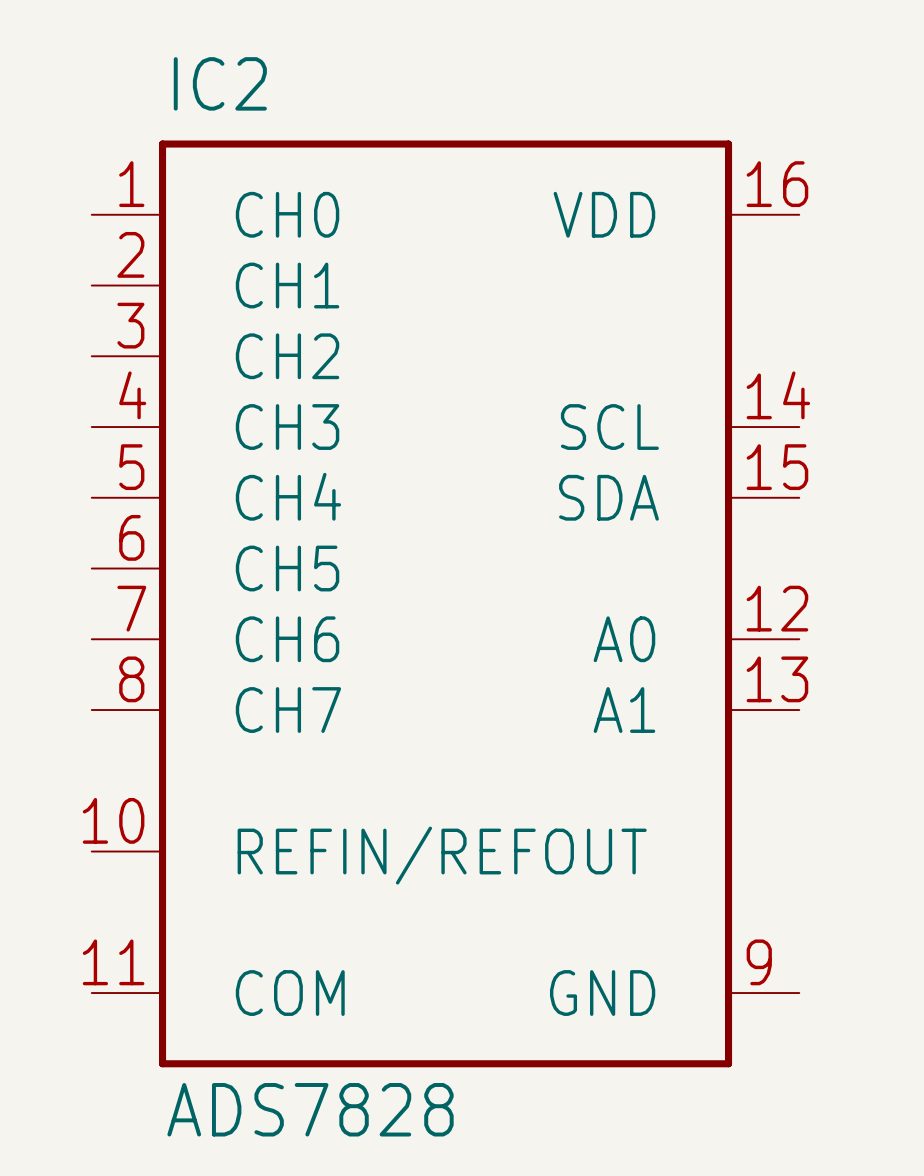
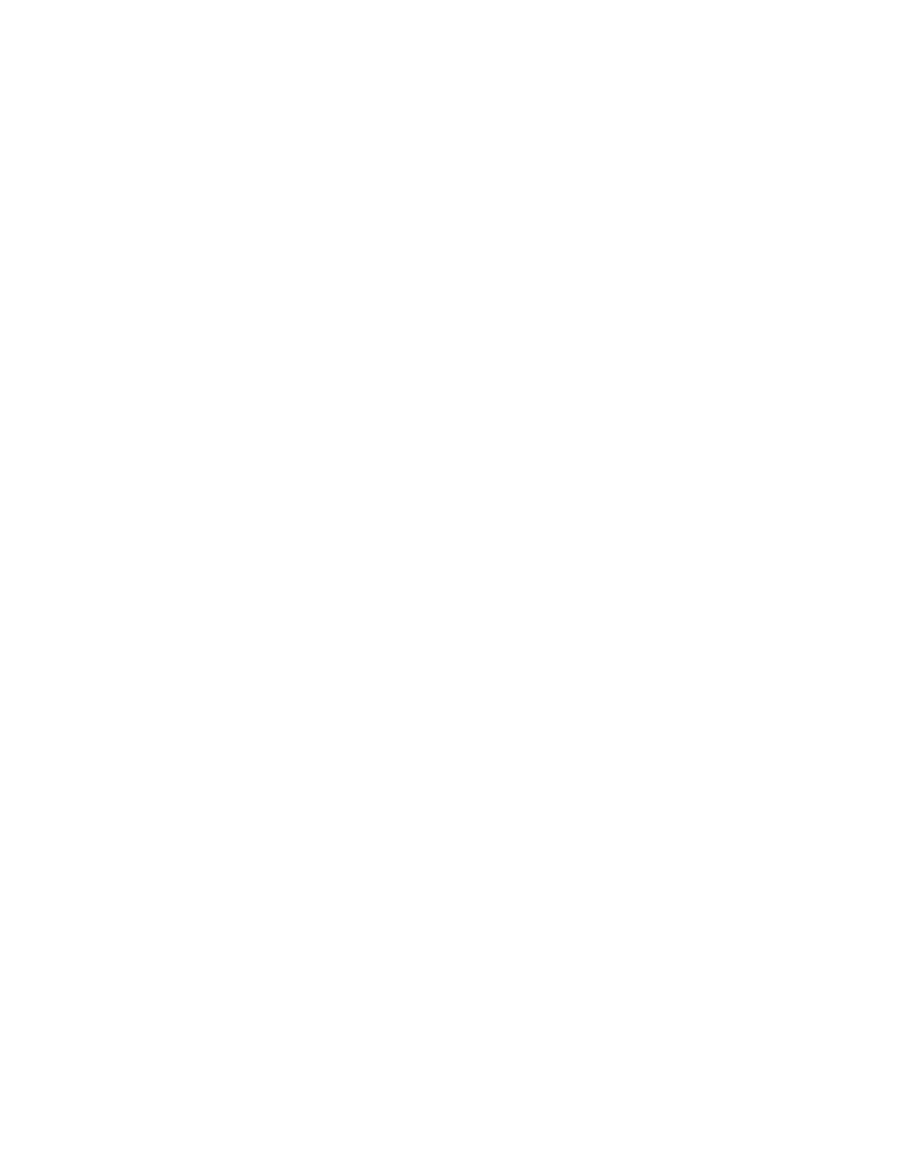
IC2: ADS7828 (445, 603) -> none

